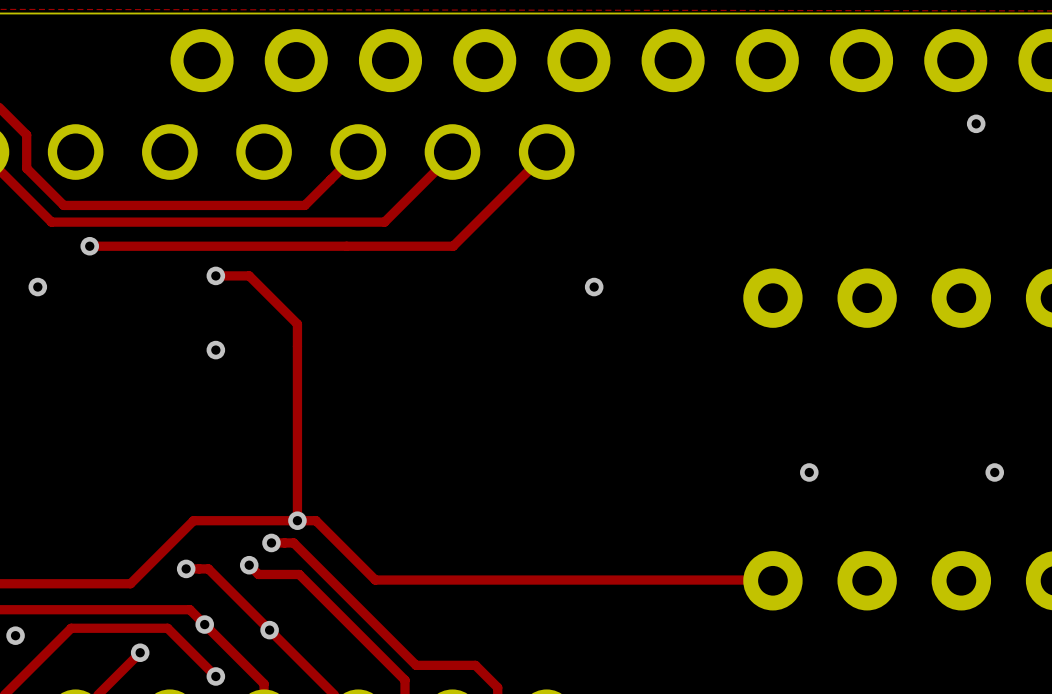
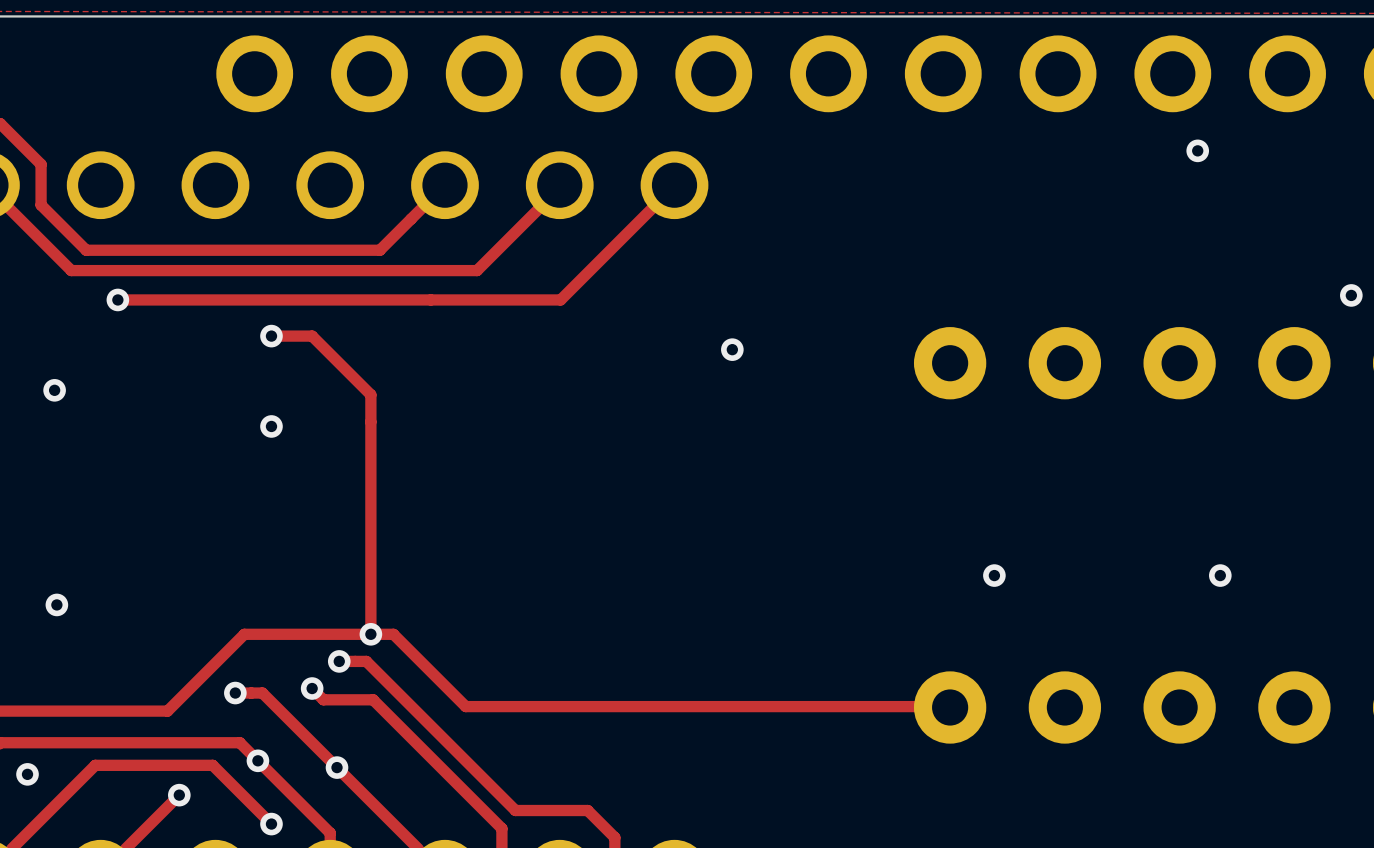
via position: (37, 287) -> (54, 390)
via: none -> (56, 604)

